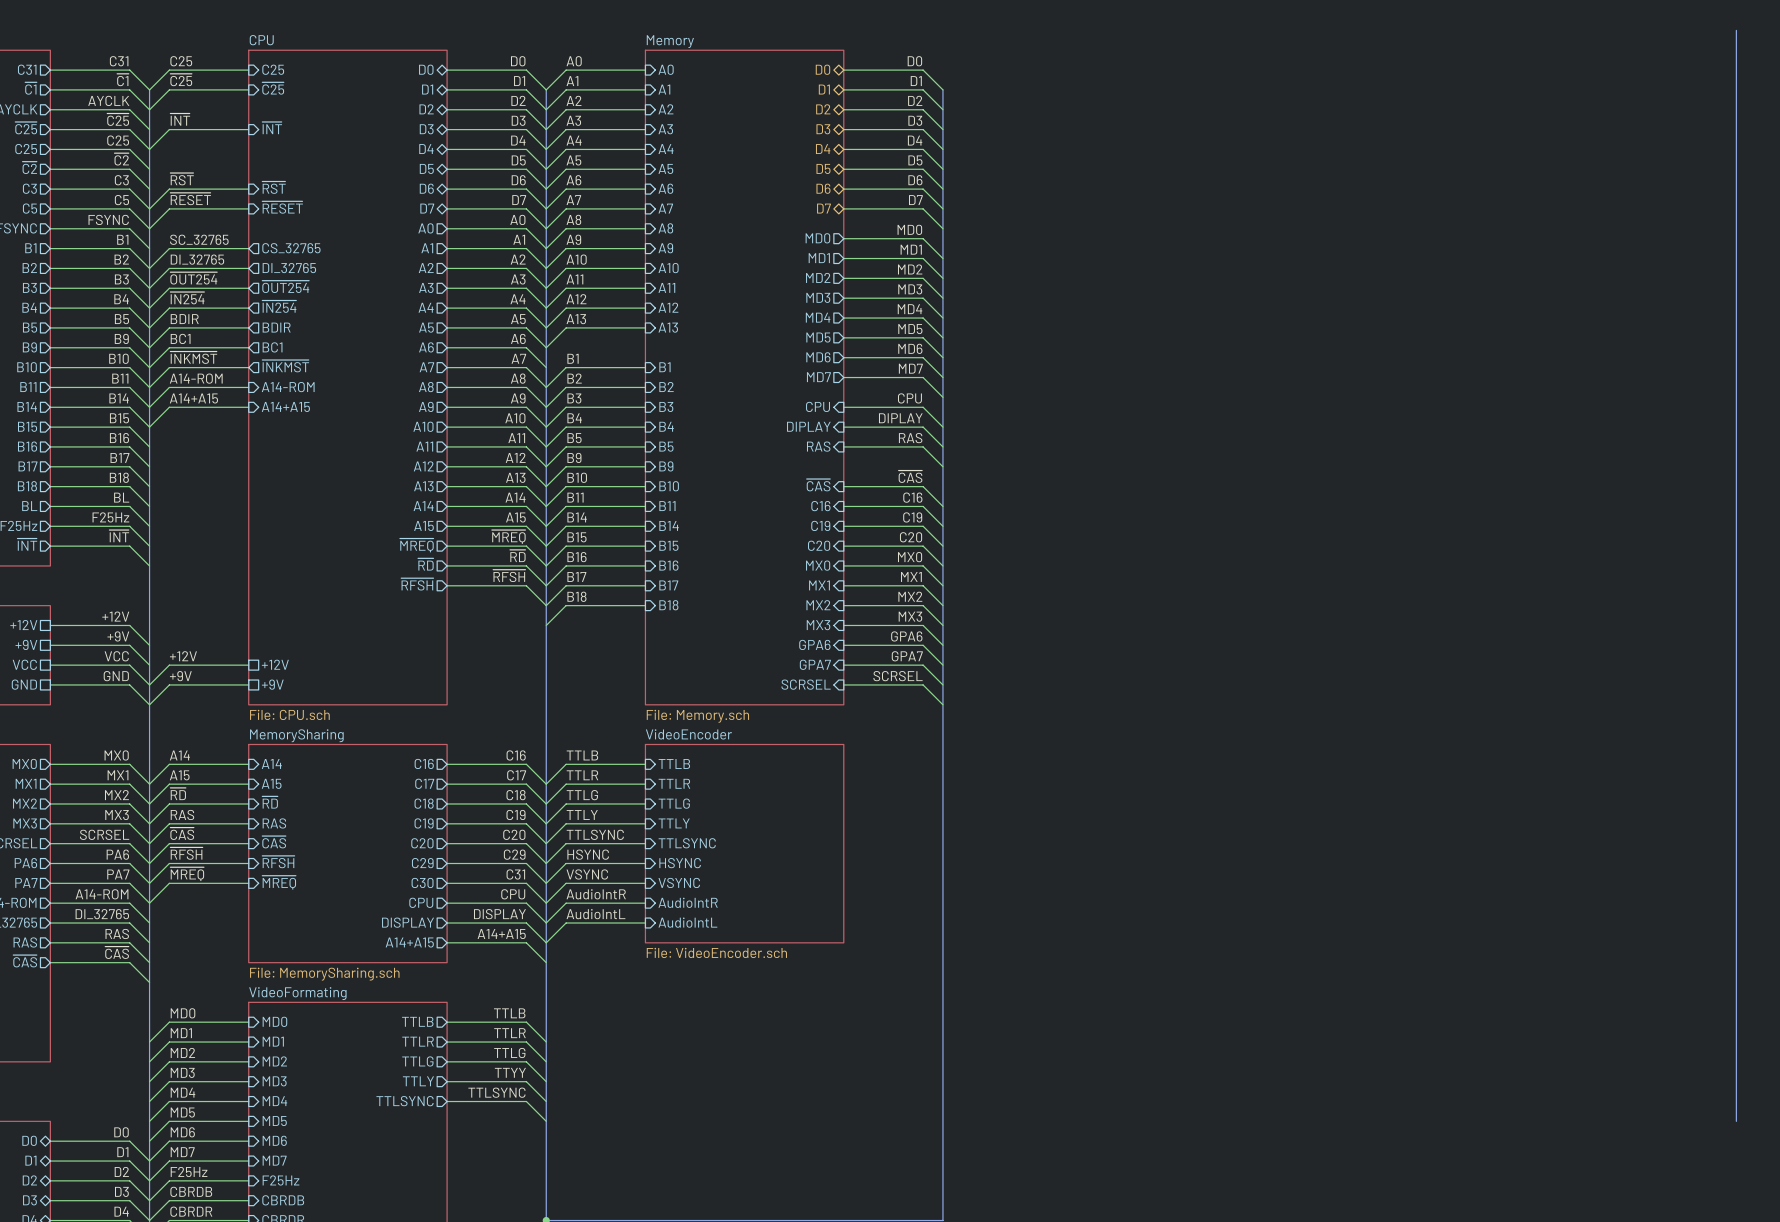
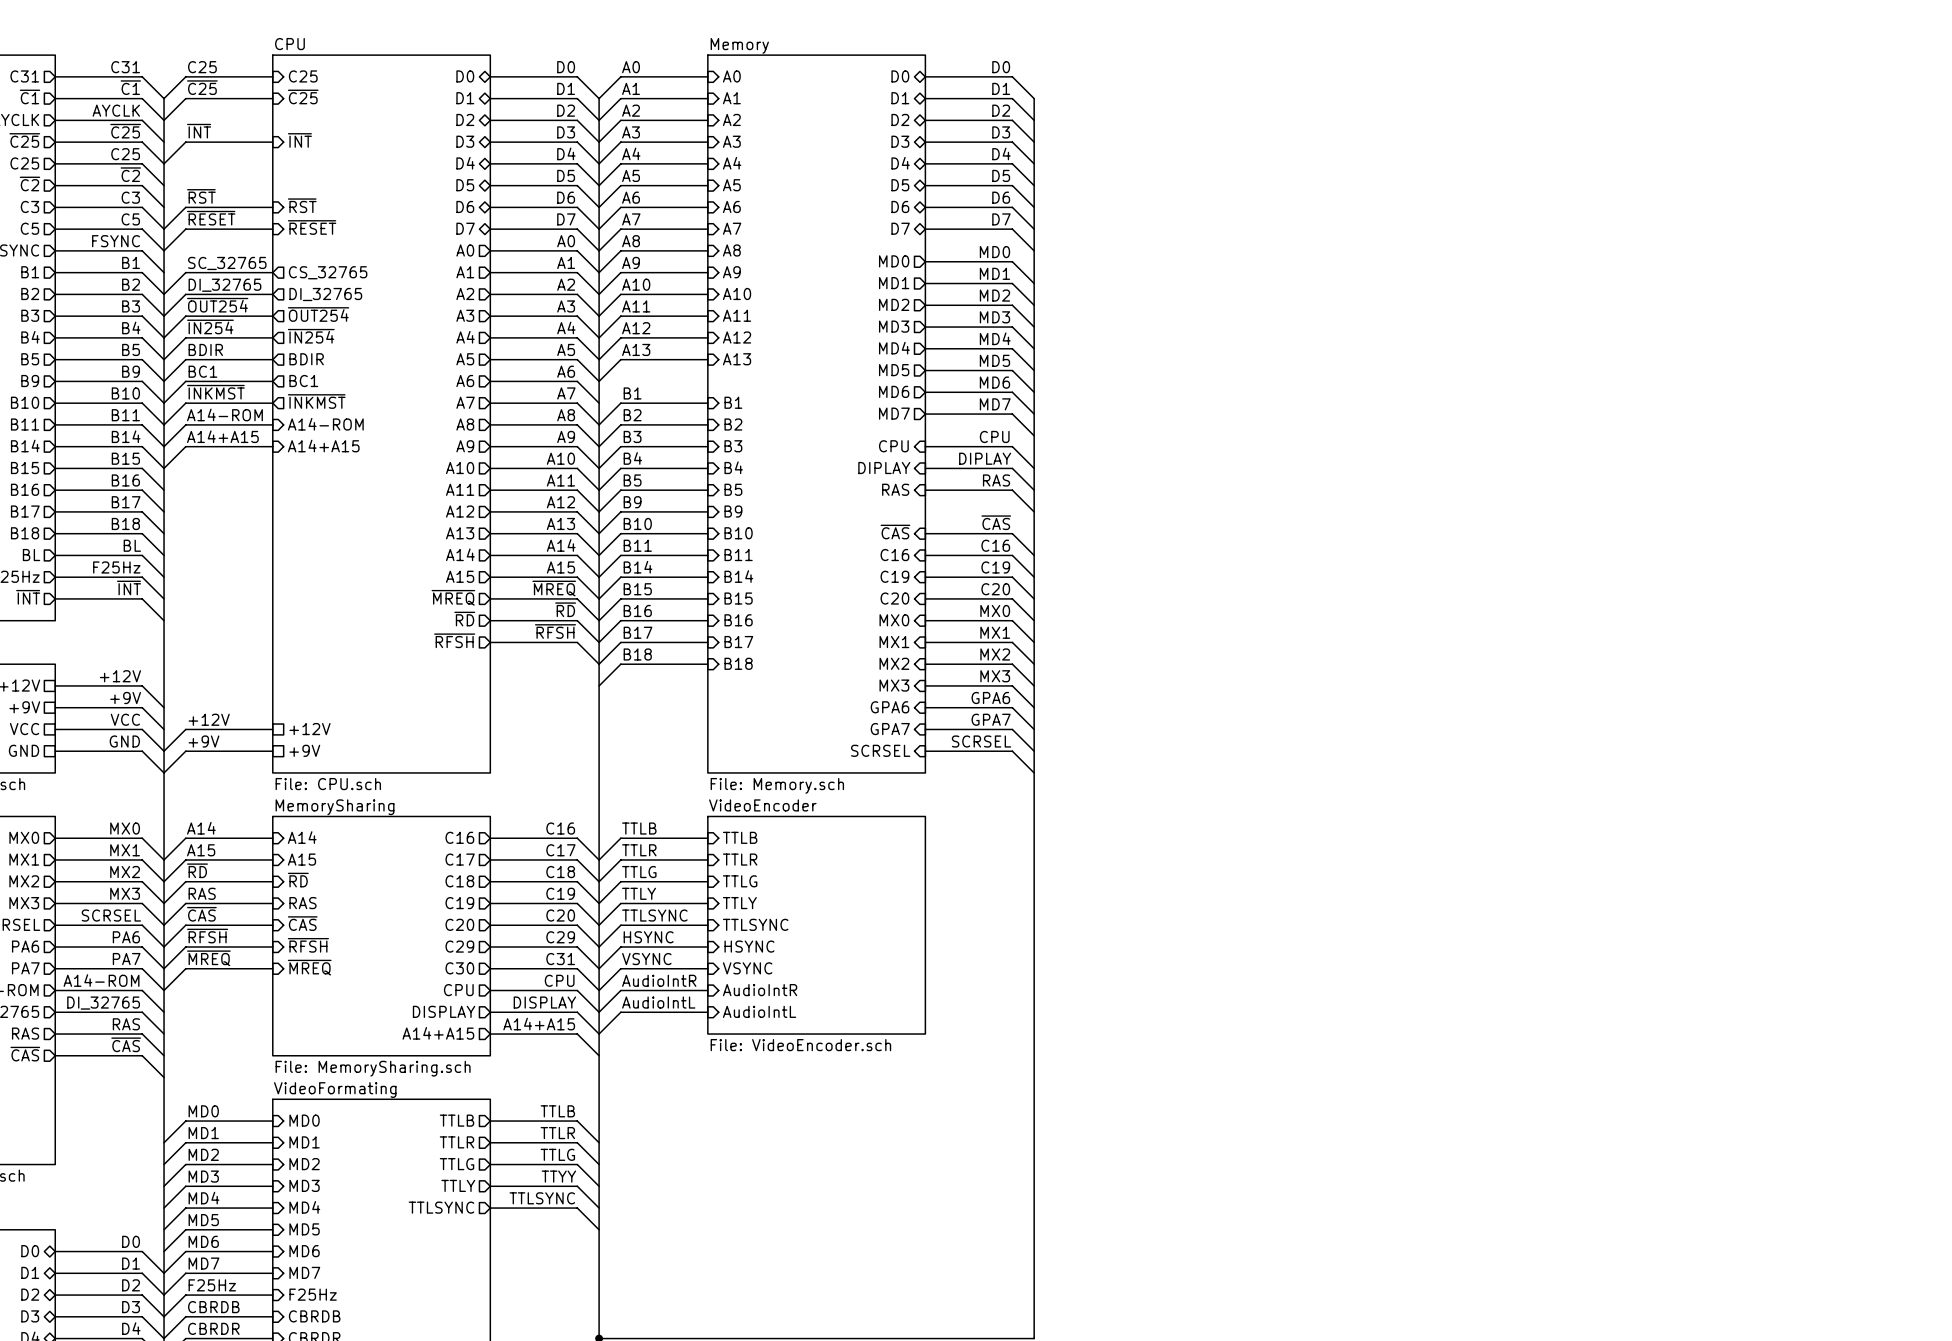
bus: (1736, 30) (1736, 1121) -> none

